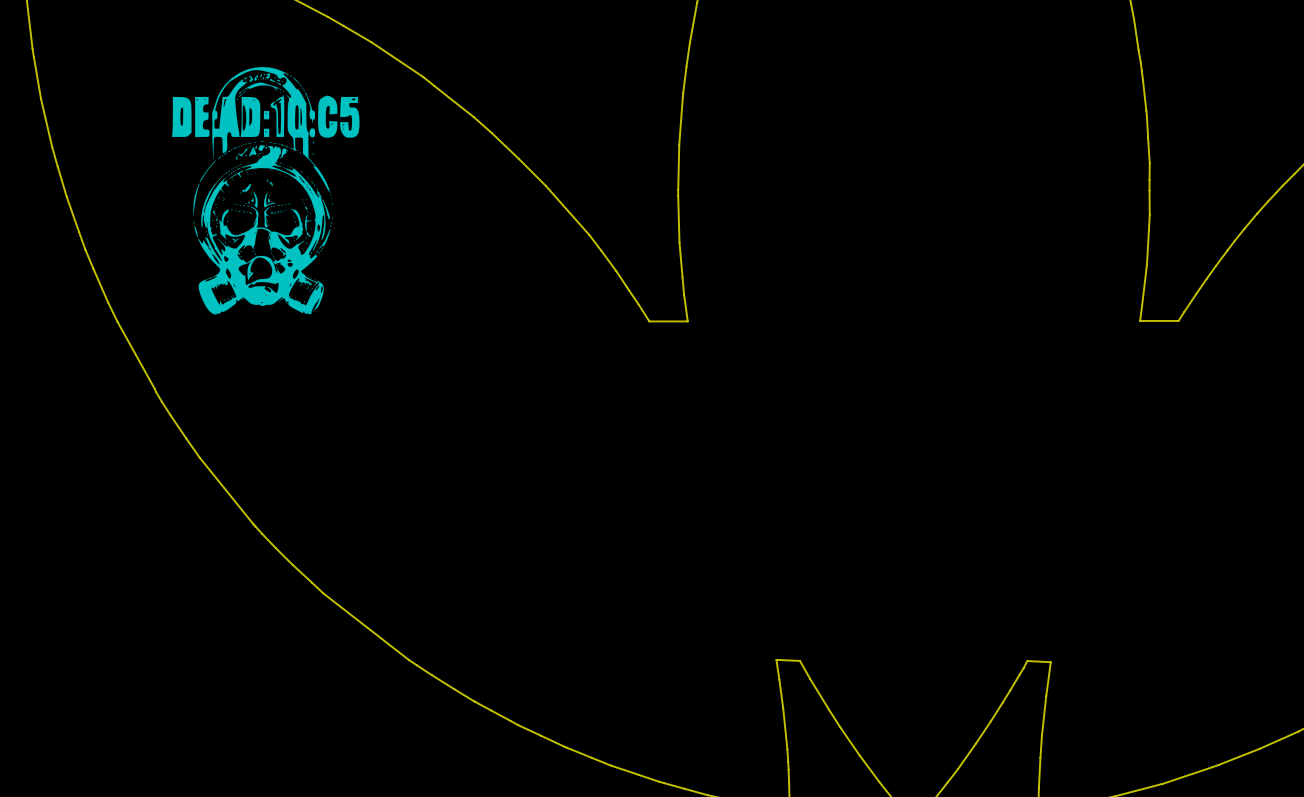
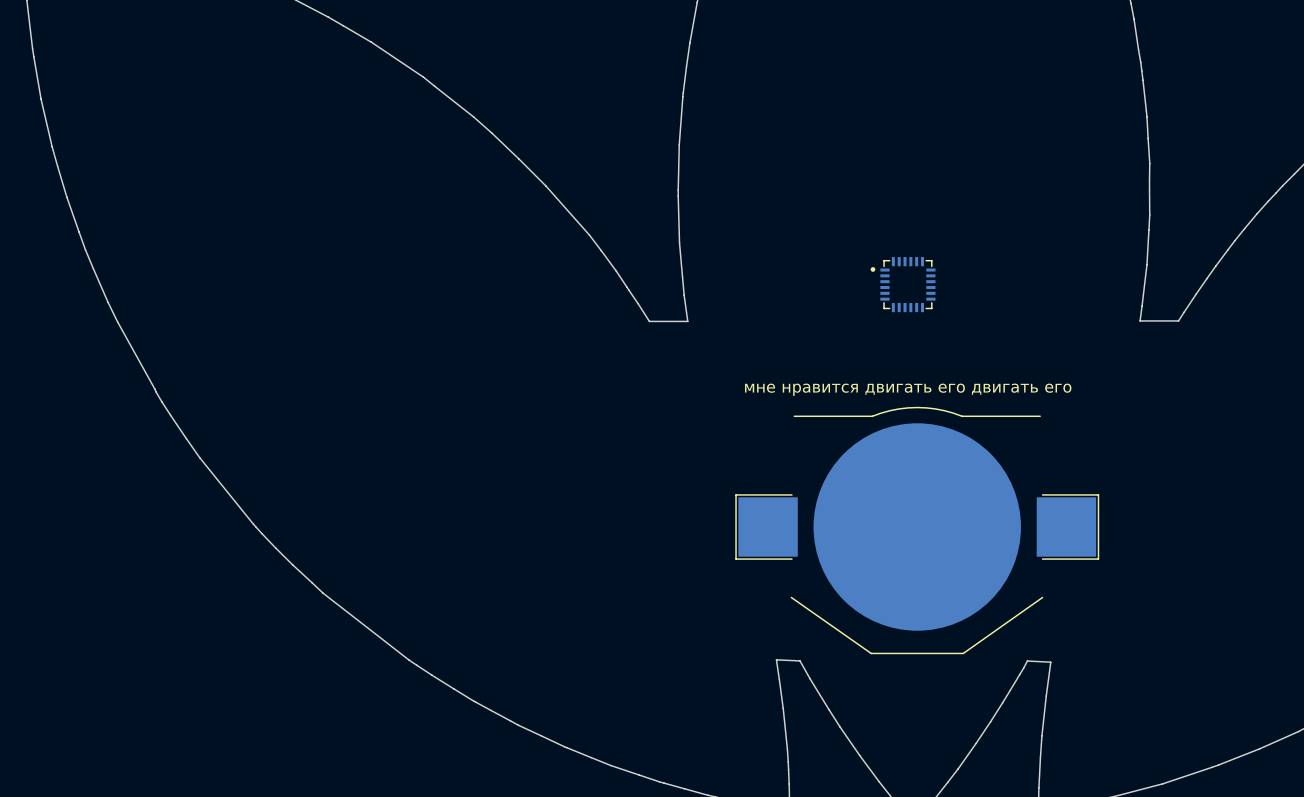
drawing: [171, 66, 360, 315] -> none
part: none -> (903, 284)
text: none -> мне нравится двигать его двигать его (908, 389)
part: none -> (917, 530)

